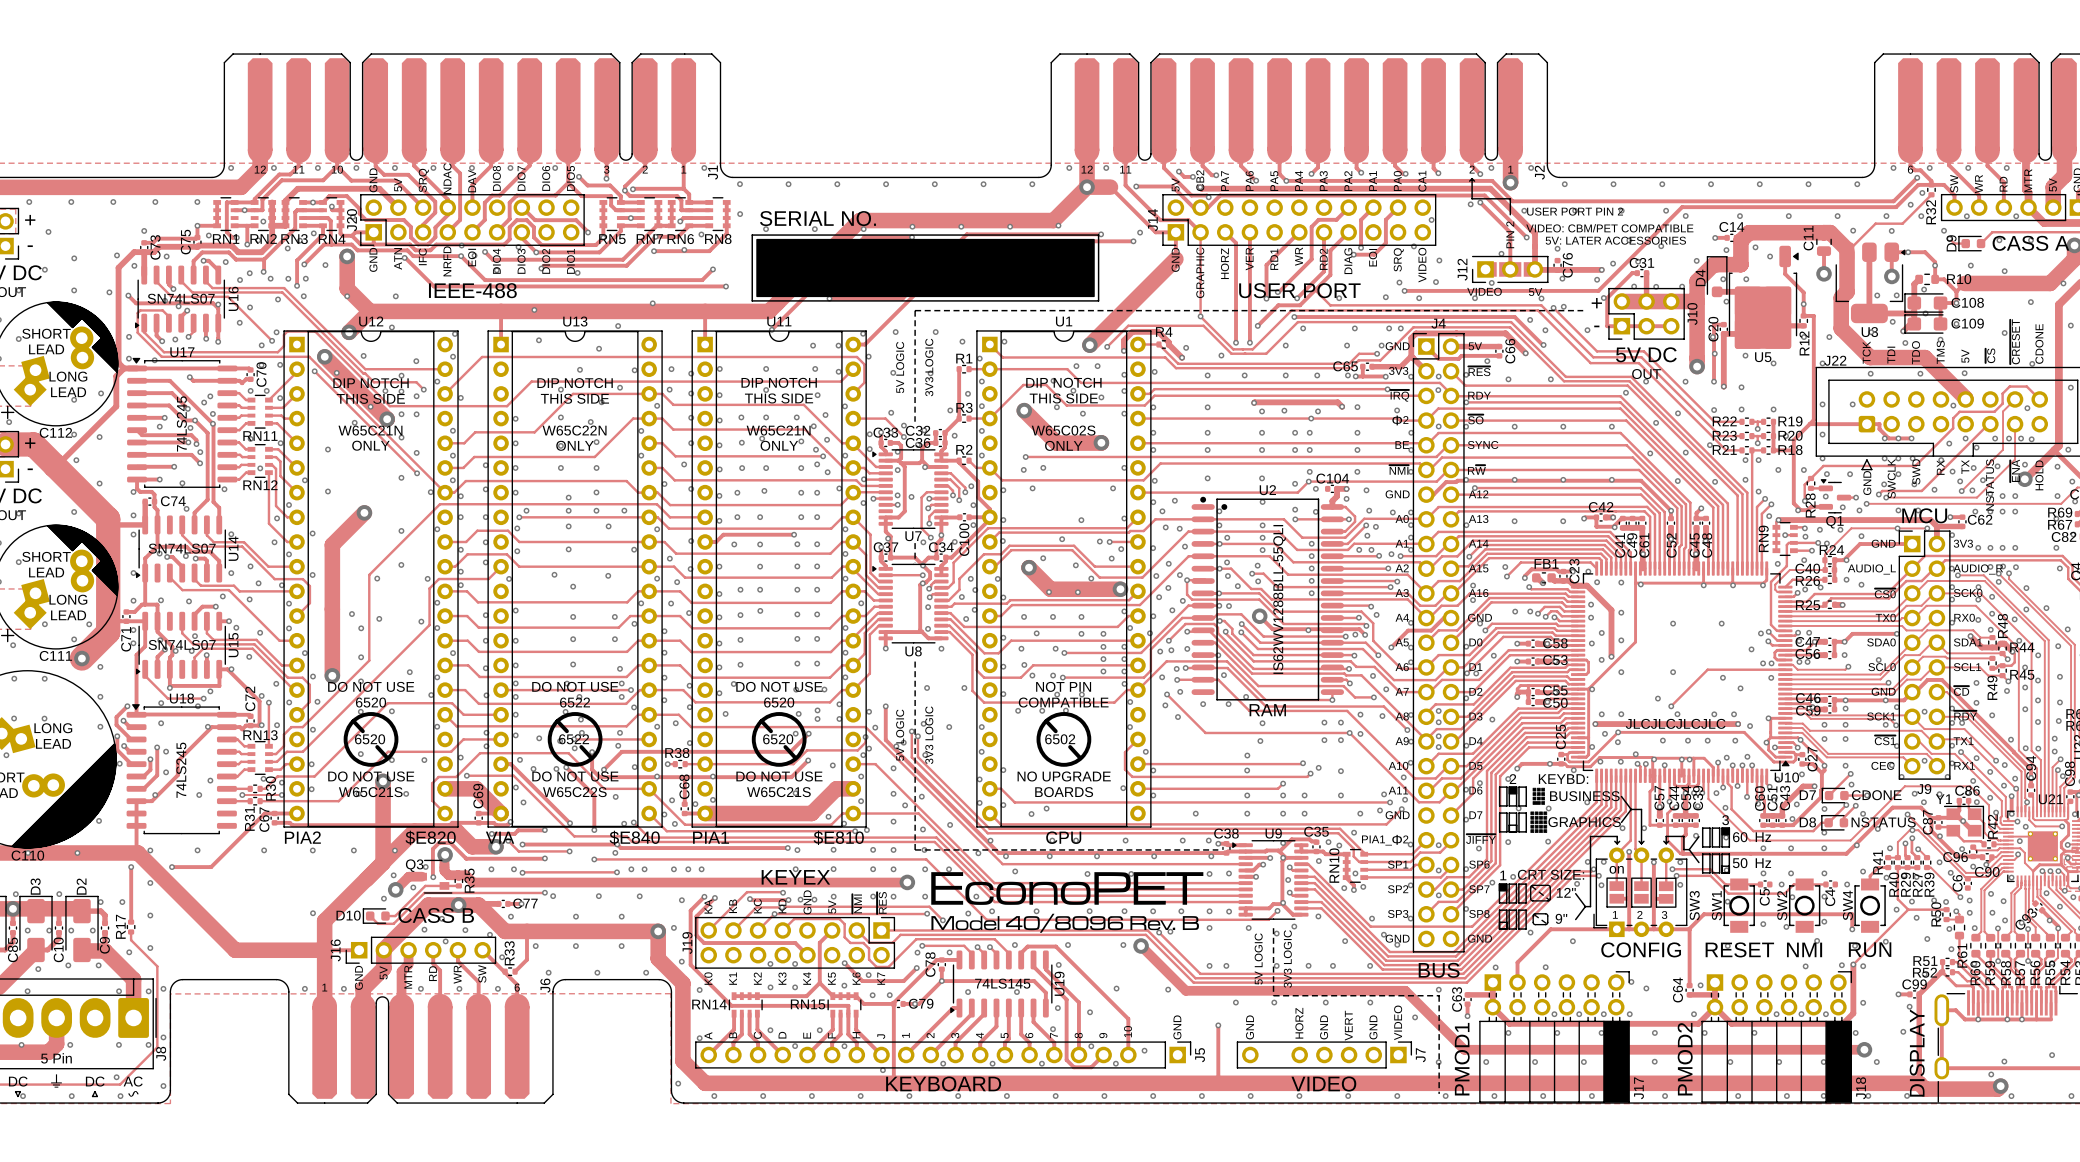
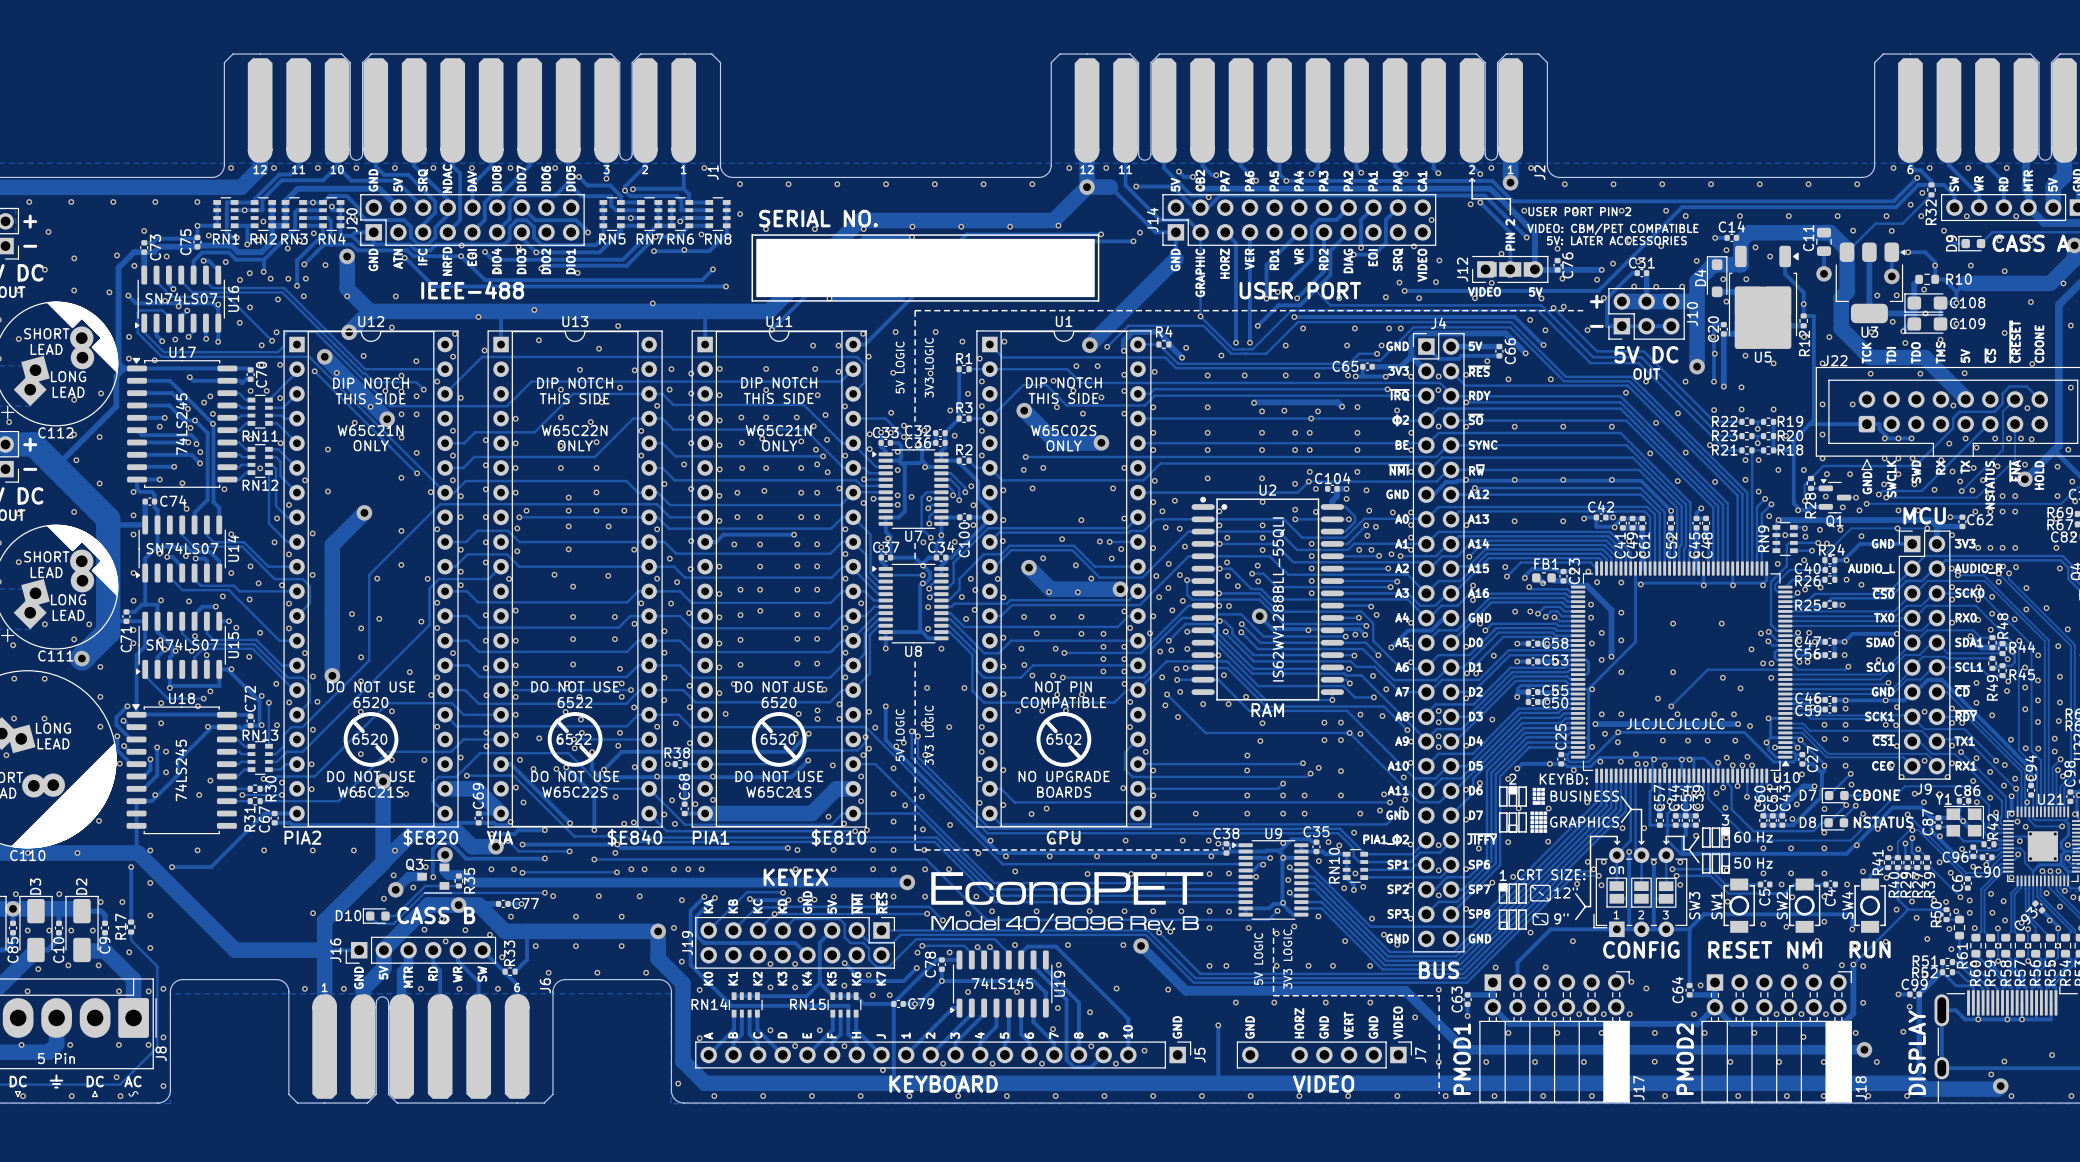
via: none -> (478, 316)
via: none -> (484, 350)
via: none -> (485, 440)
via: none -> (1803, 1036)

